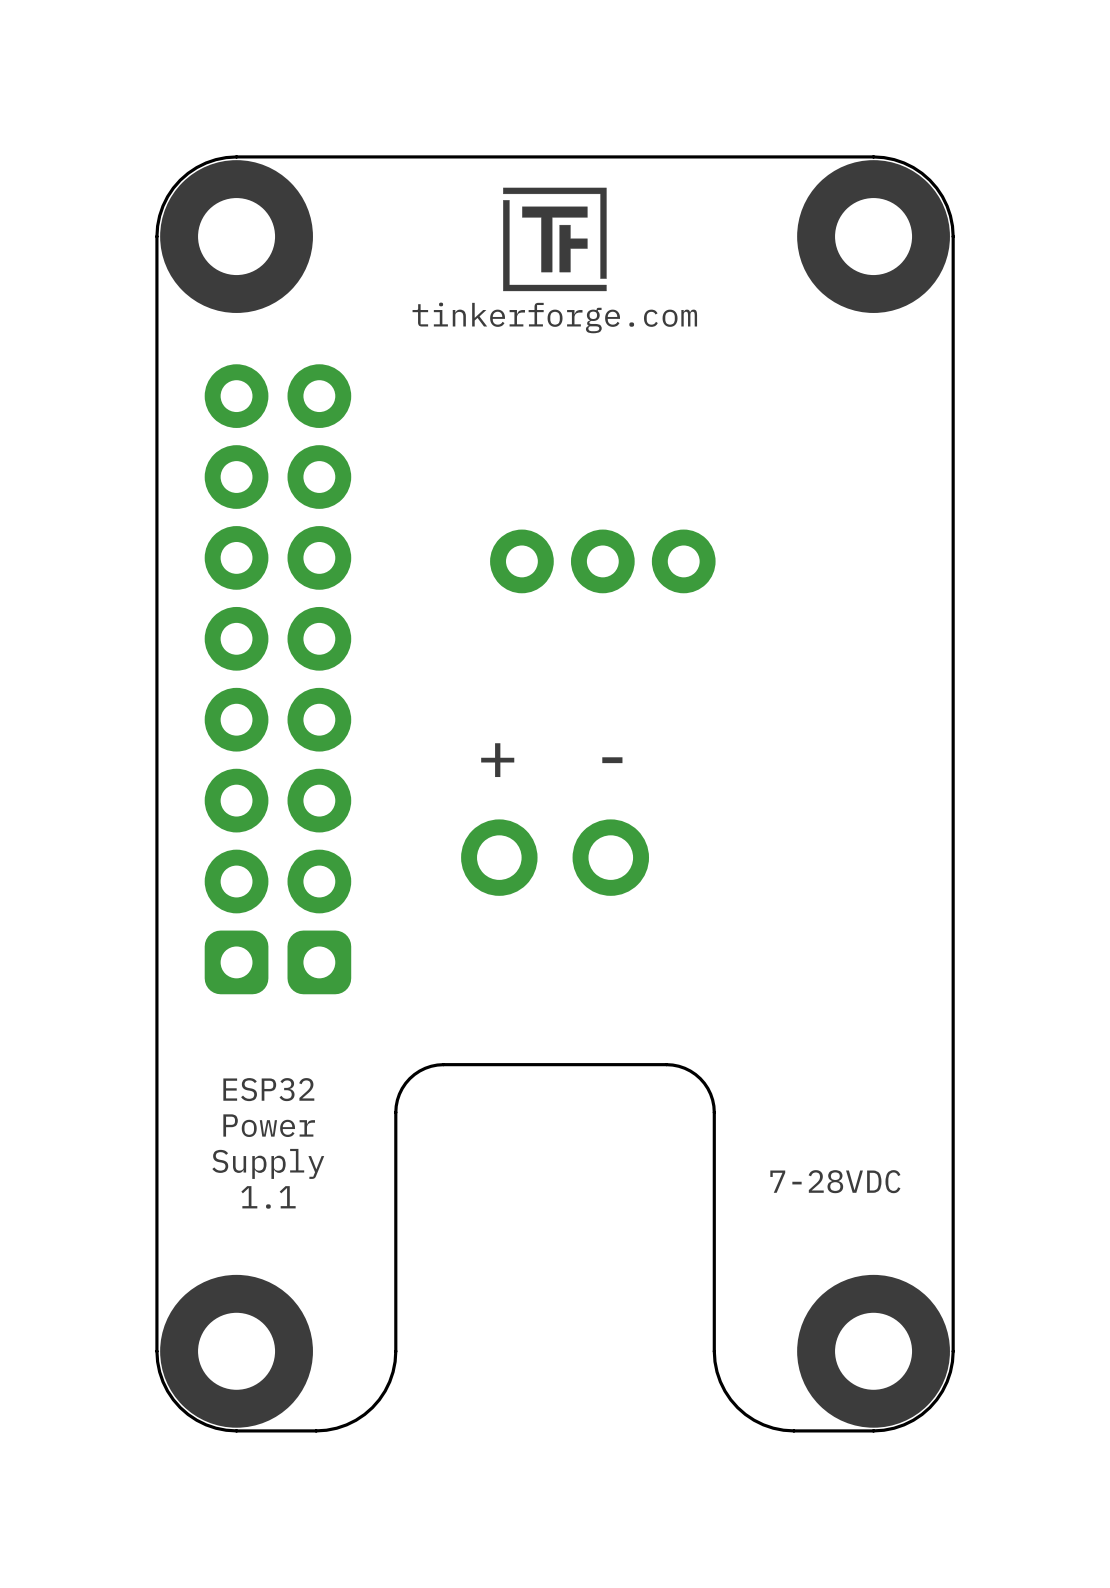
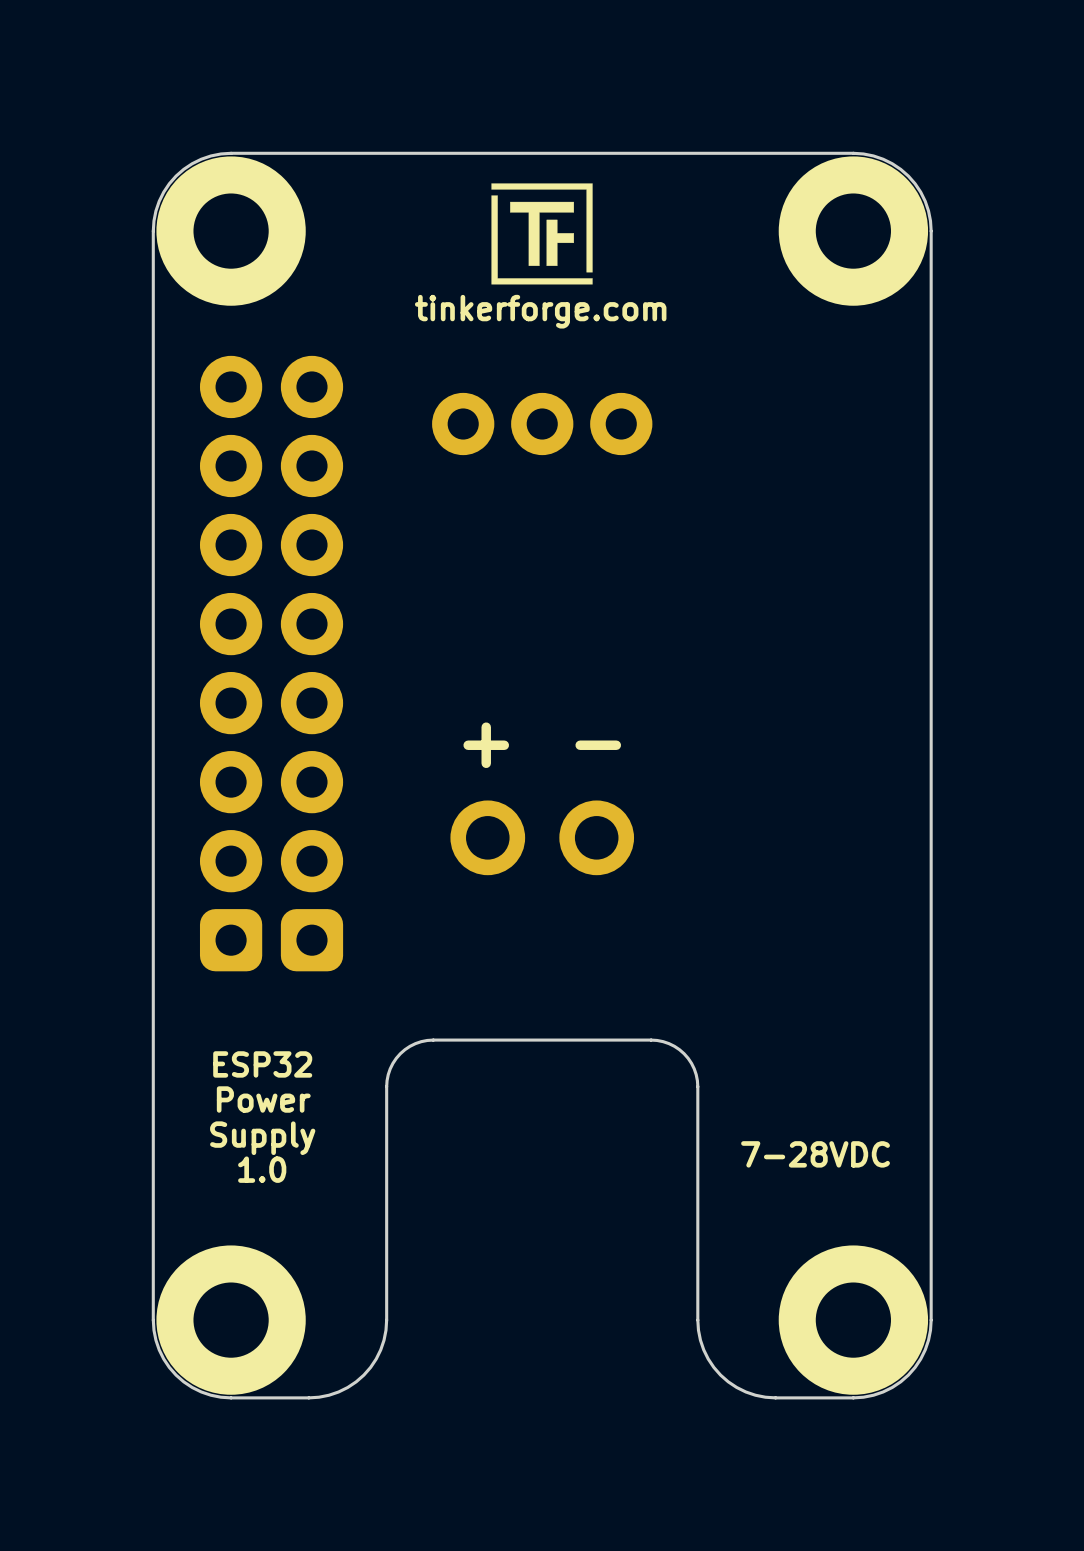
part position: (602, 561) -> (542, 424)
text: 1.1 (268, 1197) -> 1.0 (262, 1169)

